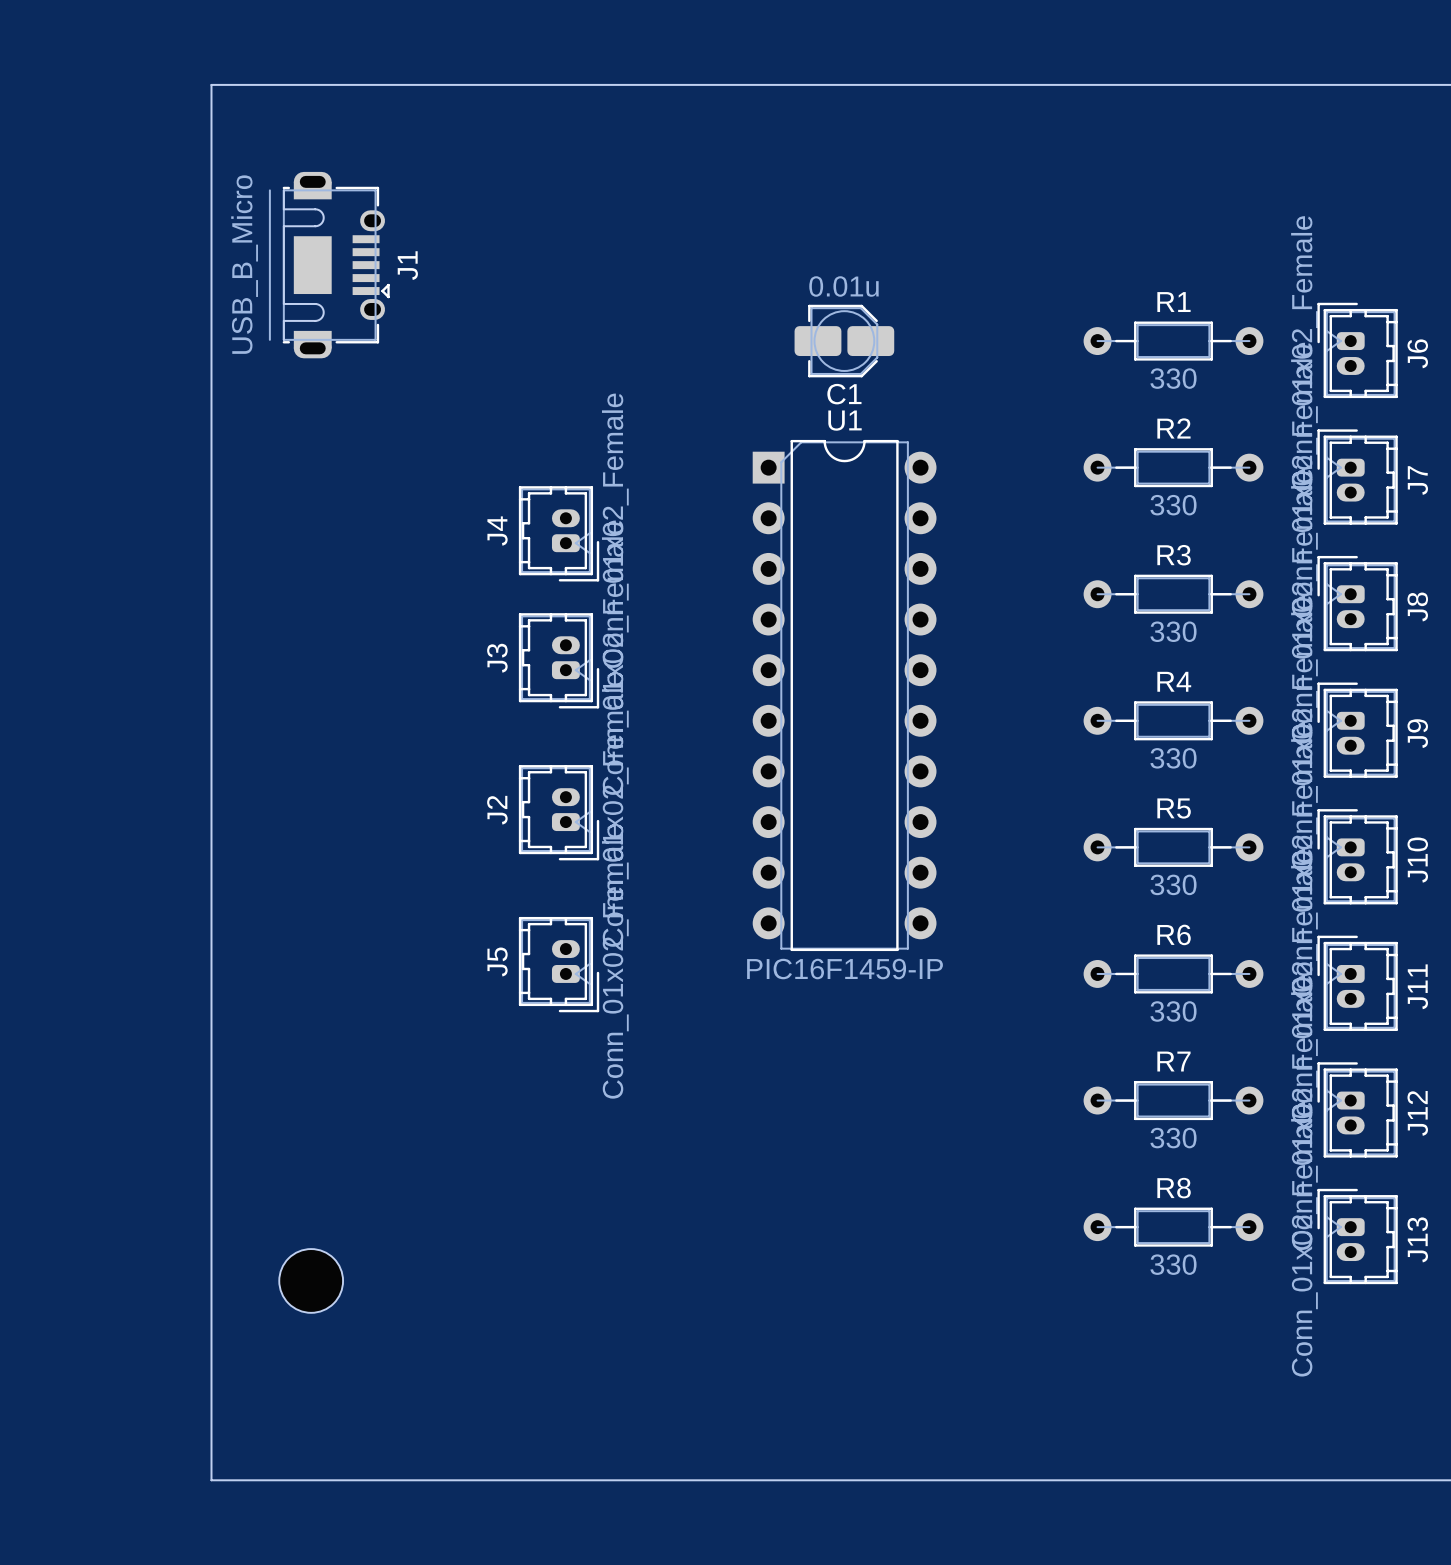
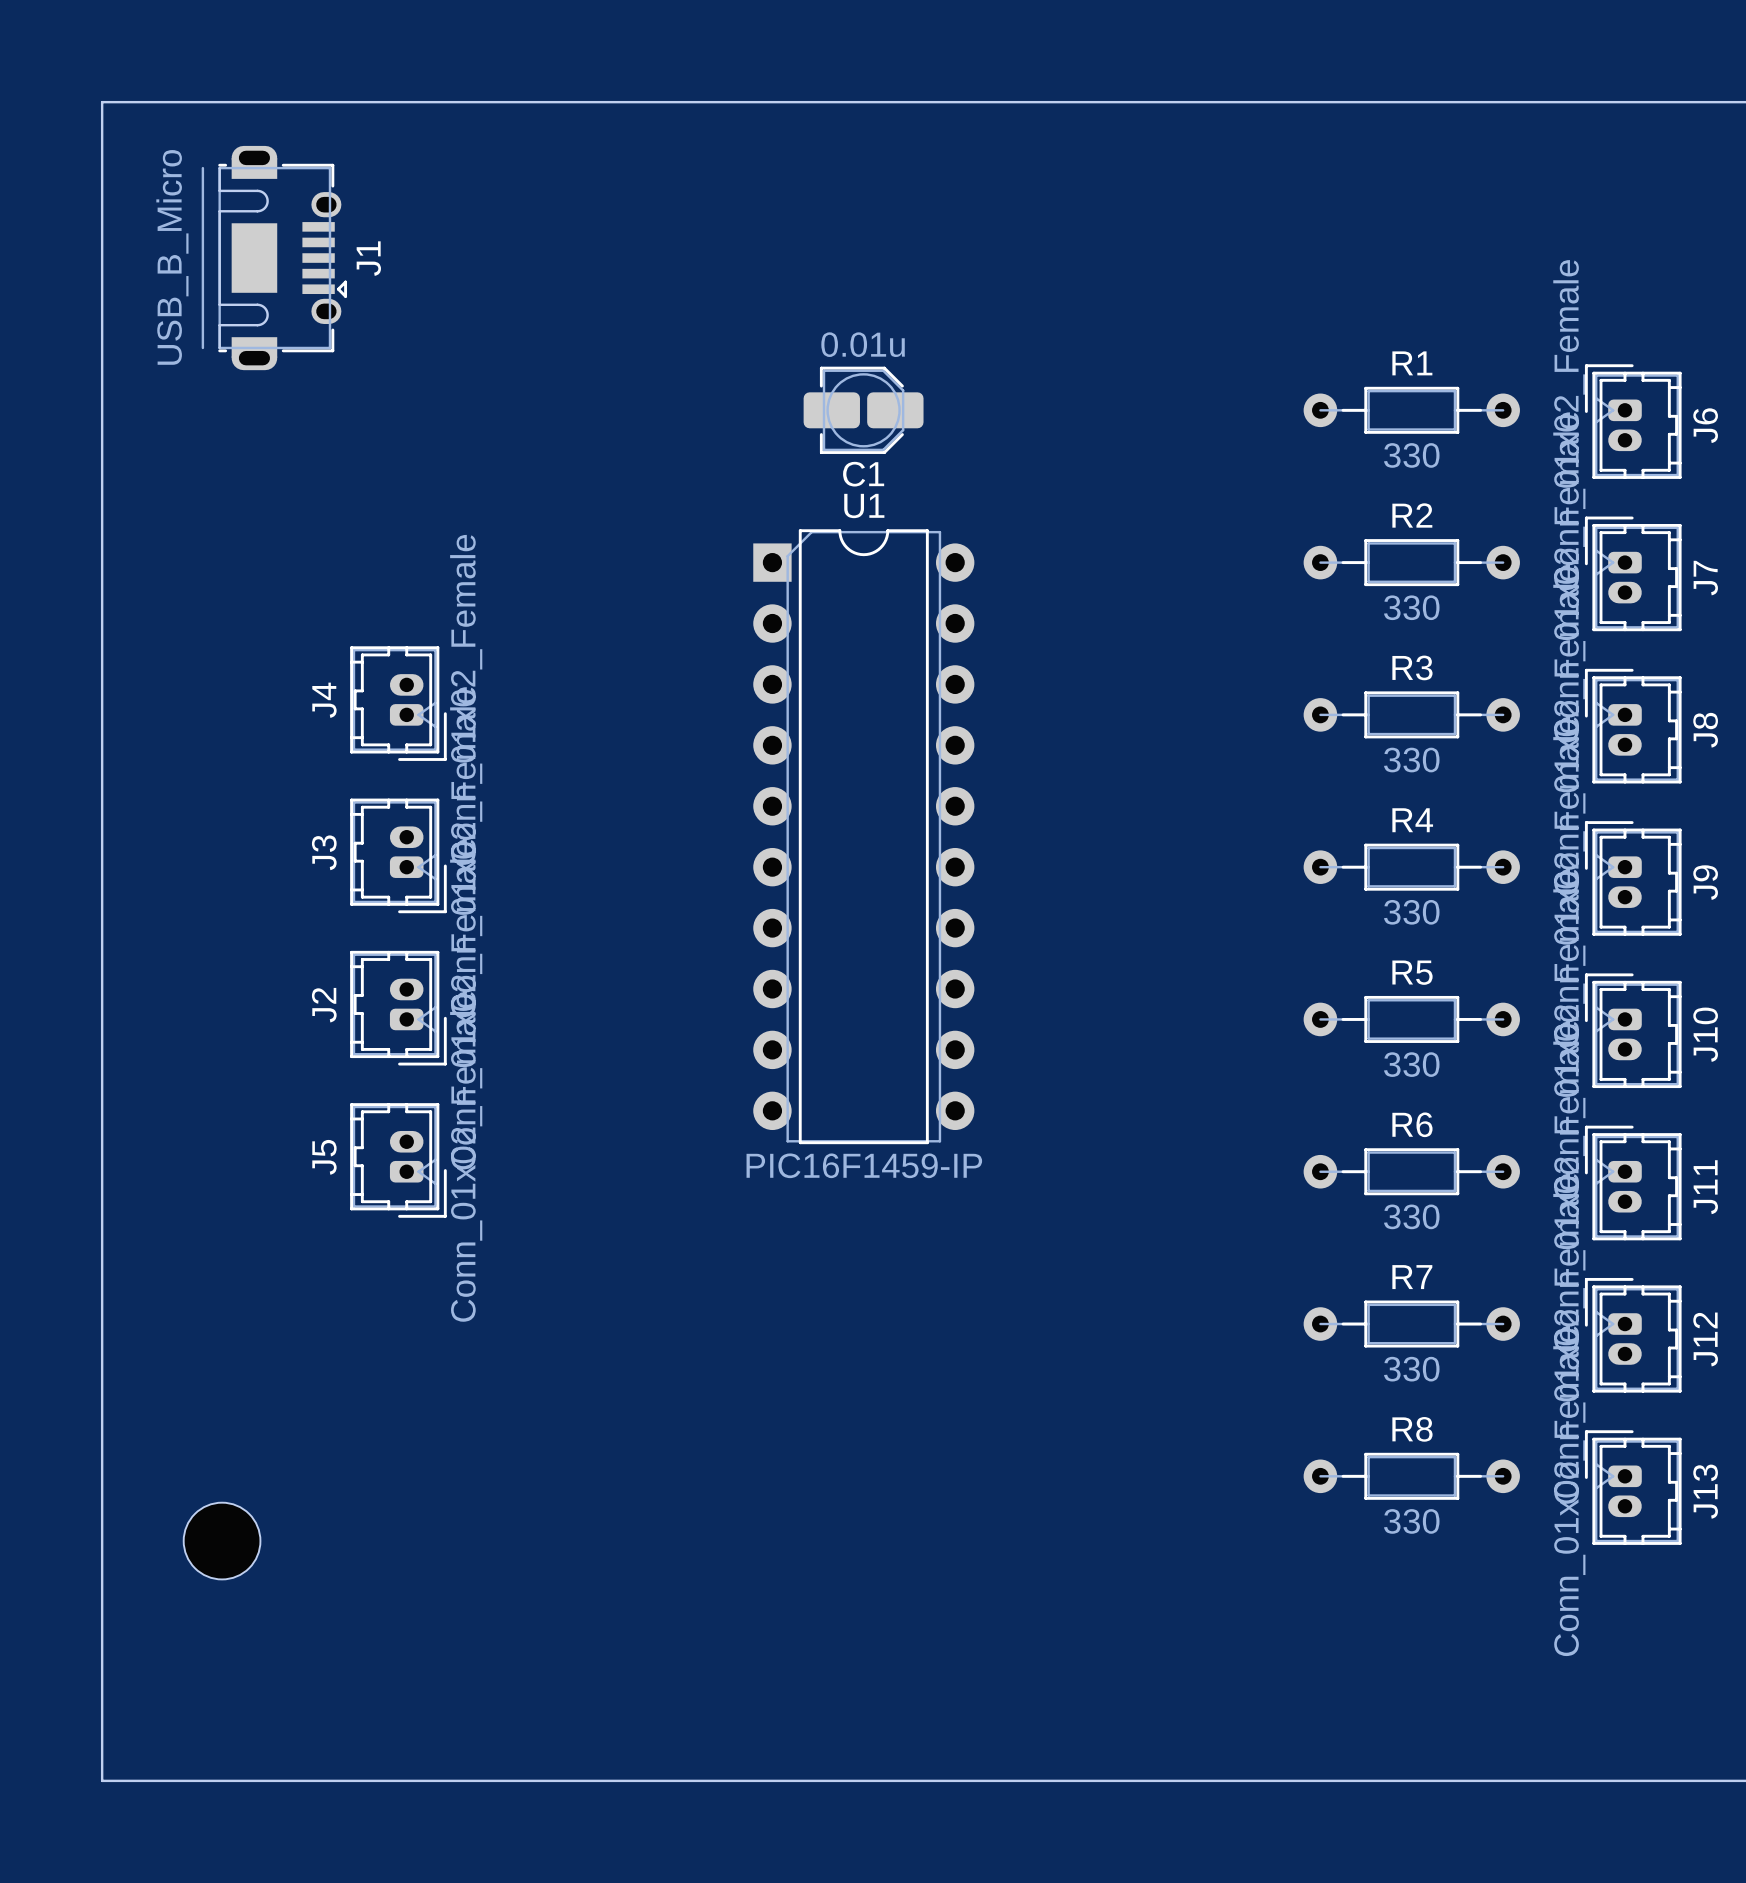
board edge: (211, 84) (211, 1480) -> (254, 102) (102, 102) (102, 1780) (254, 1780)
J1 position: (329, 265) -> (274, 258)
C1 position: (844, 341) -> (863, 410)
J4 position: (559, 533) -> (398, 703)
J3 position: (559, 660) -> (398, 855)
U1 position: (844, 695) -> (863, 836)
J2 position: (559, 812) -> (398, 1008)
J5 position: (559, 964) -> (398, 1160)
part position: (311, 1280) -> (222, 1541)

